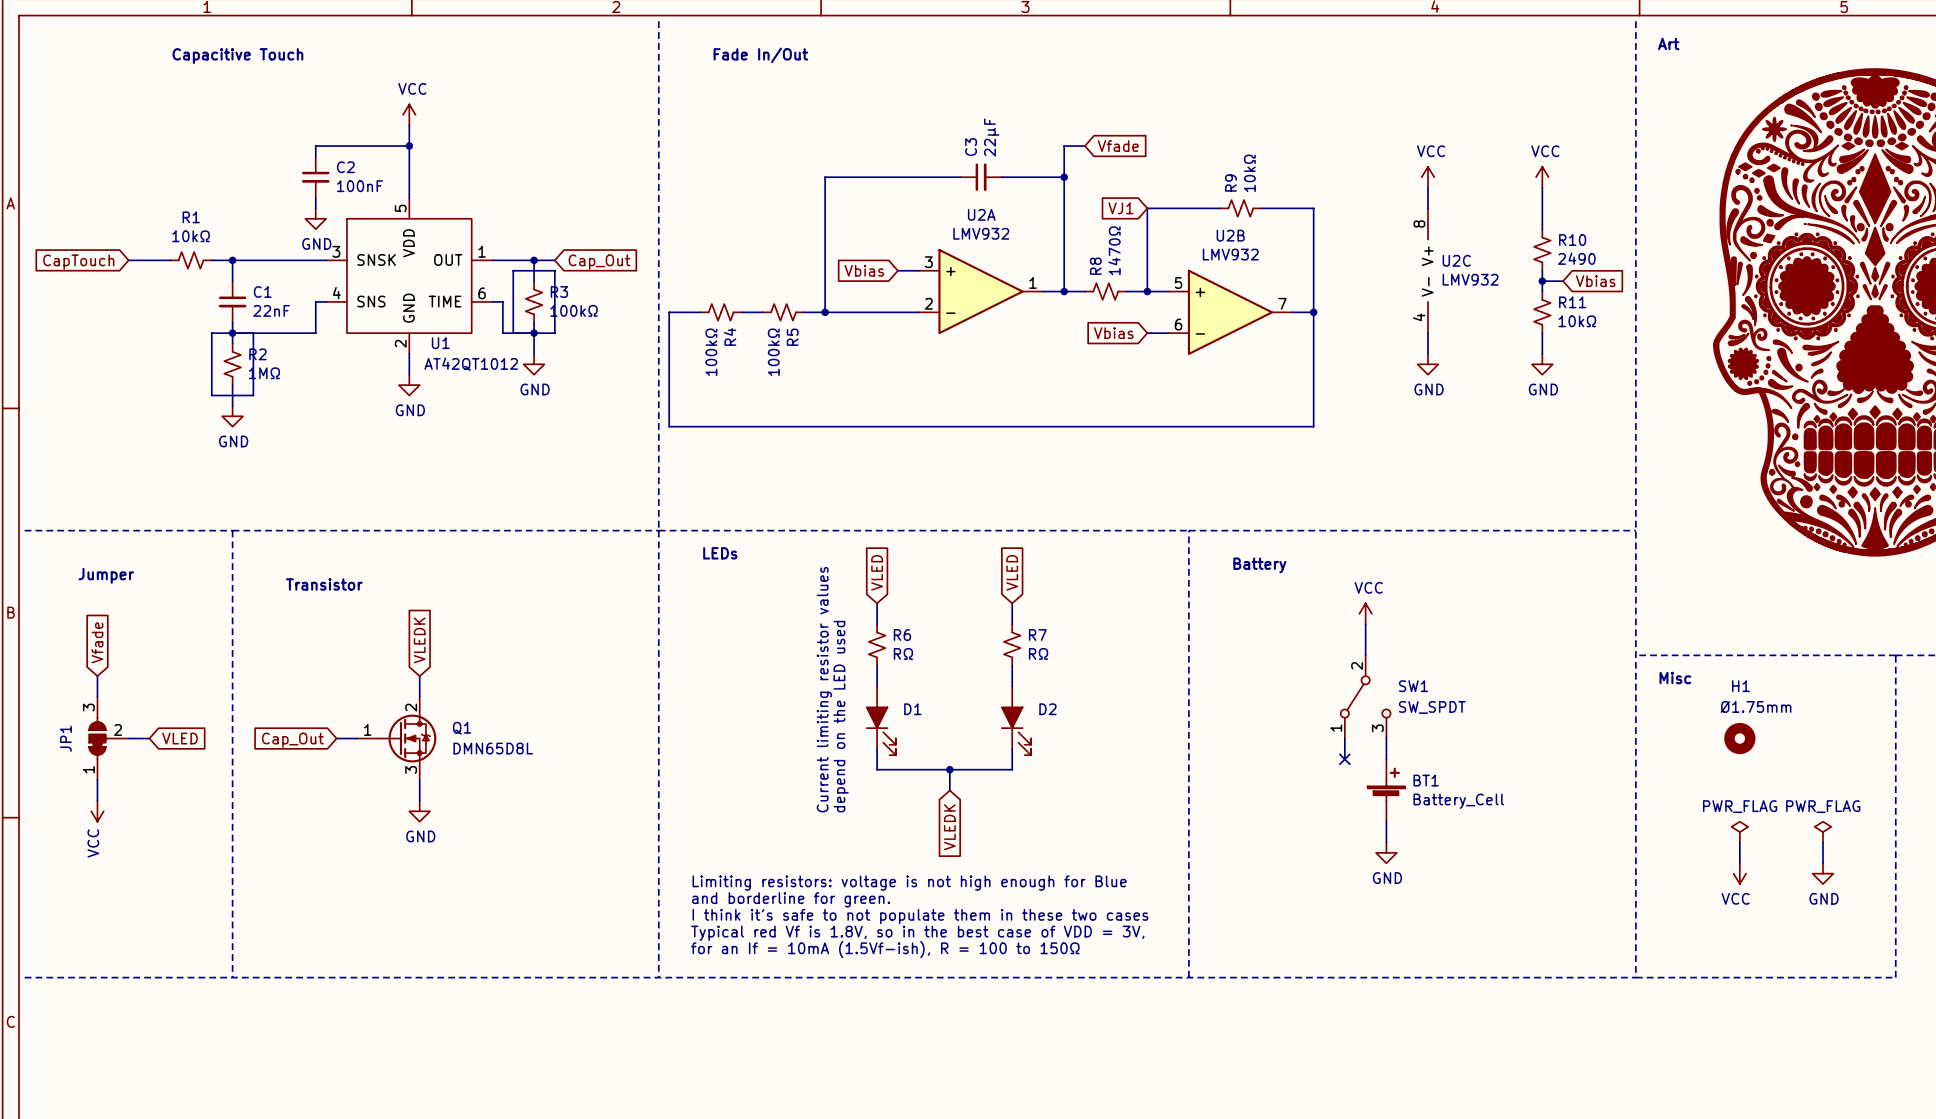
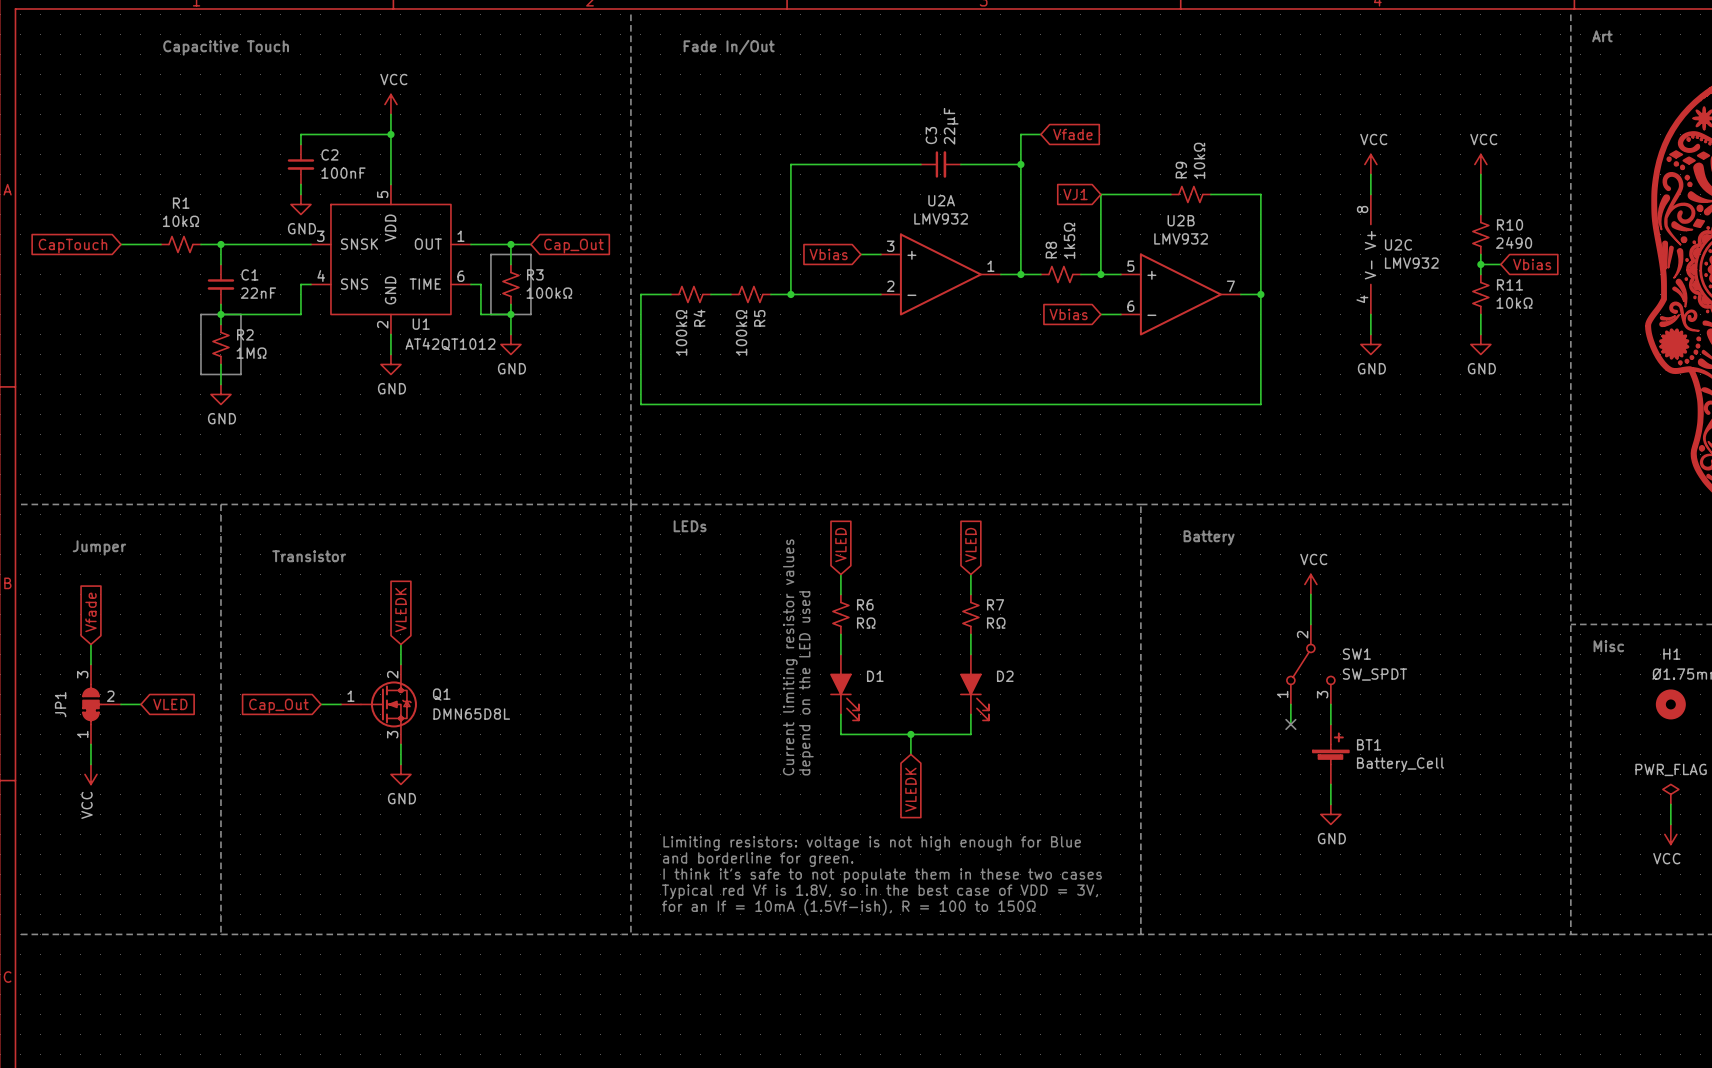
R8 value: 1470Ω (1114, 250) -> 1k5Ω (1069, 240)

